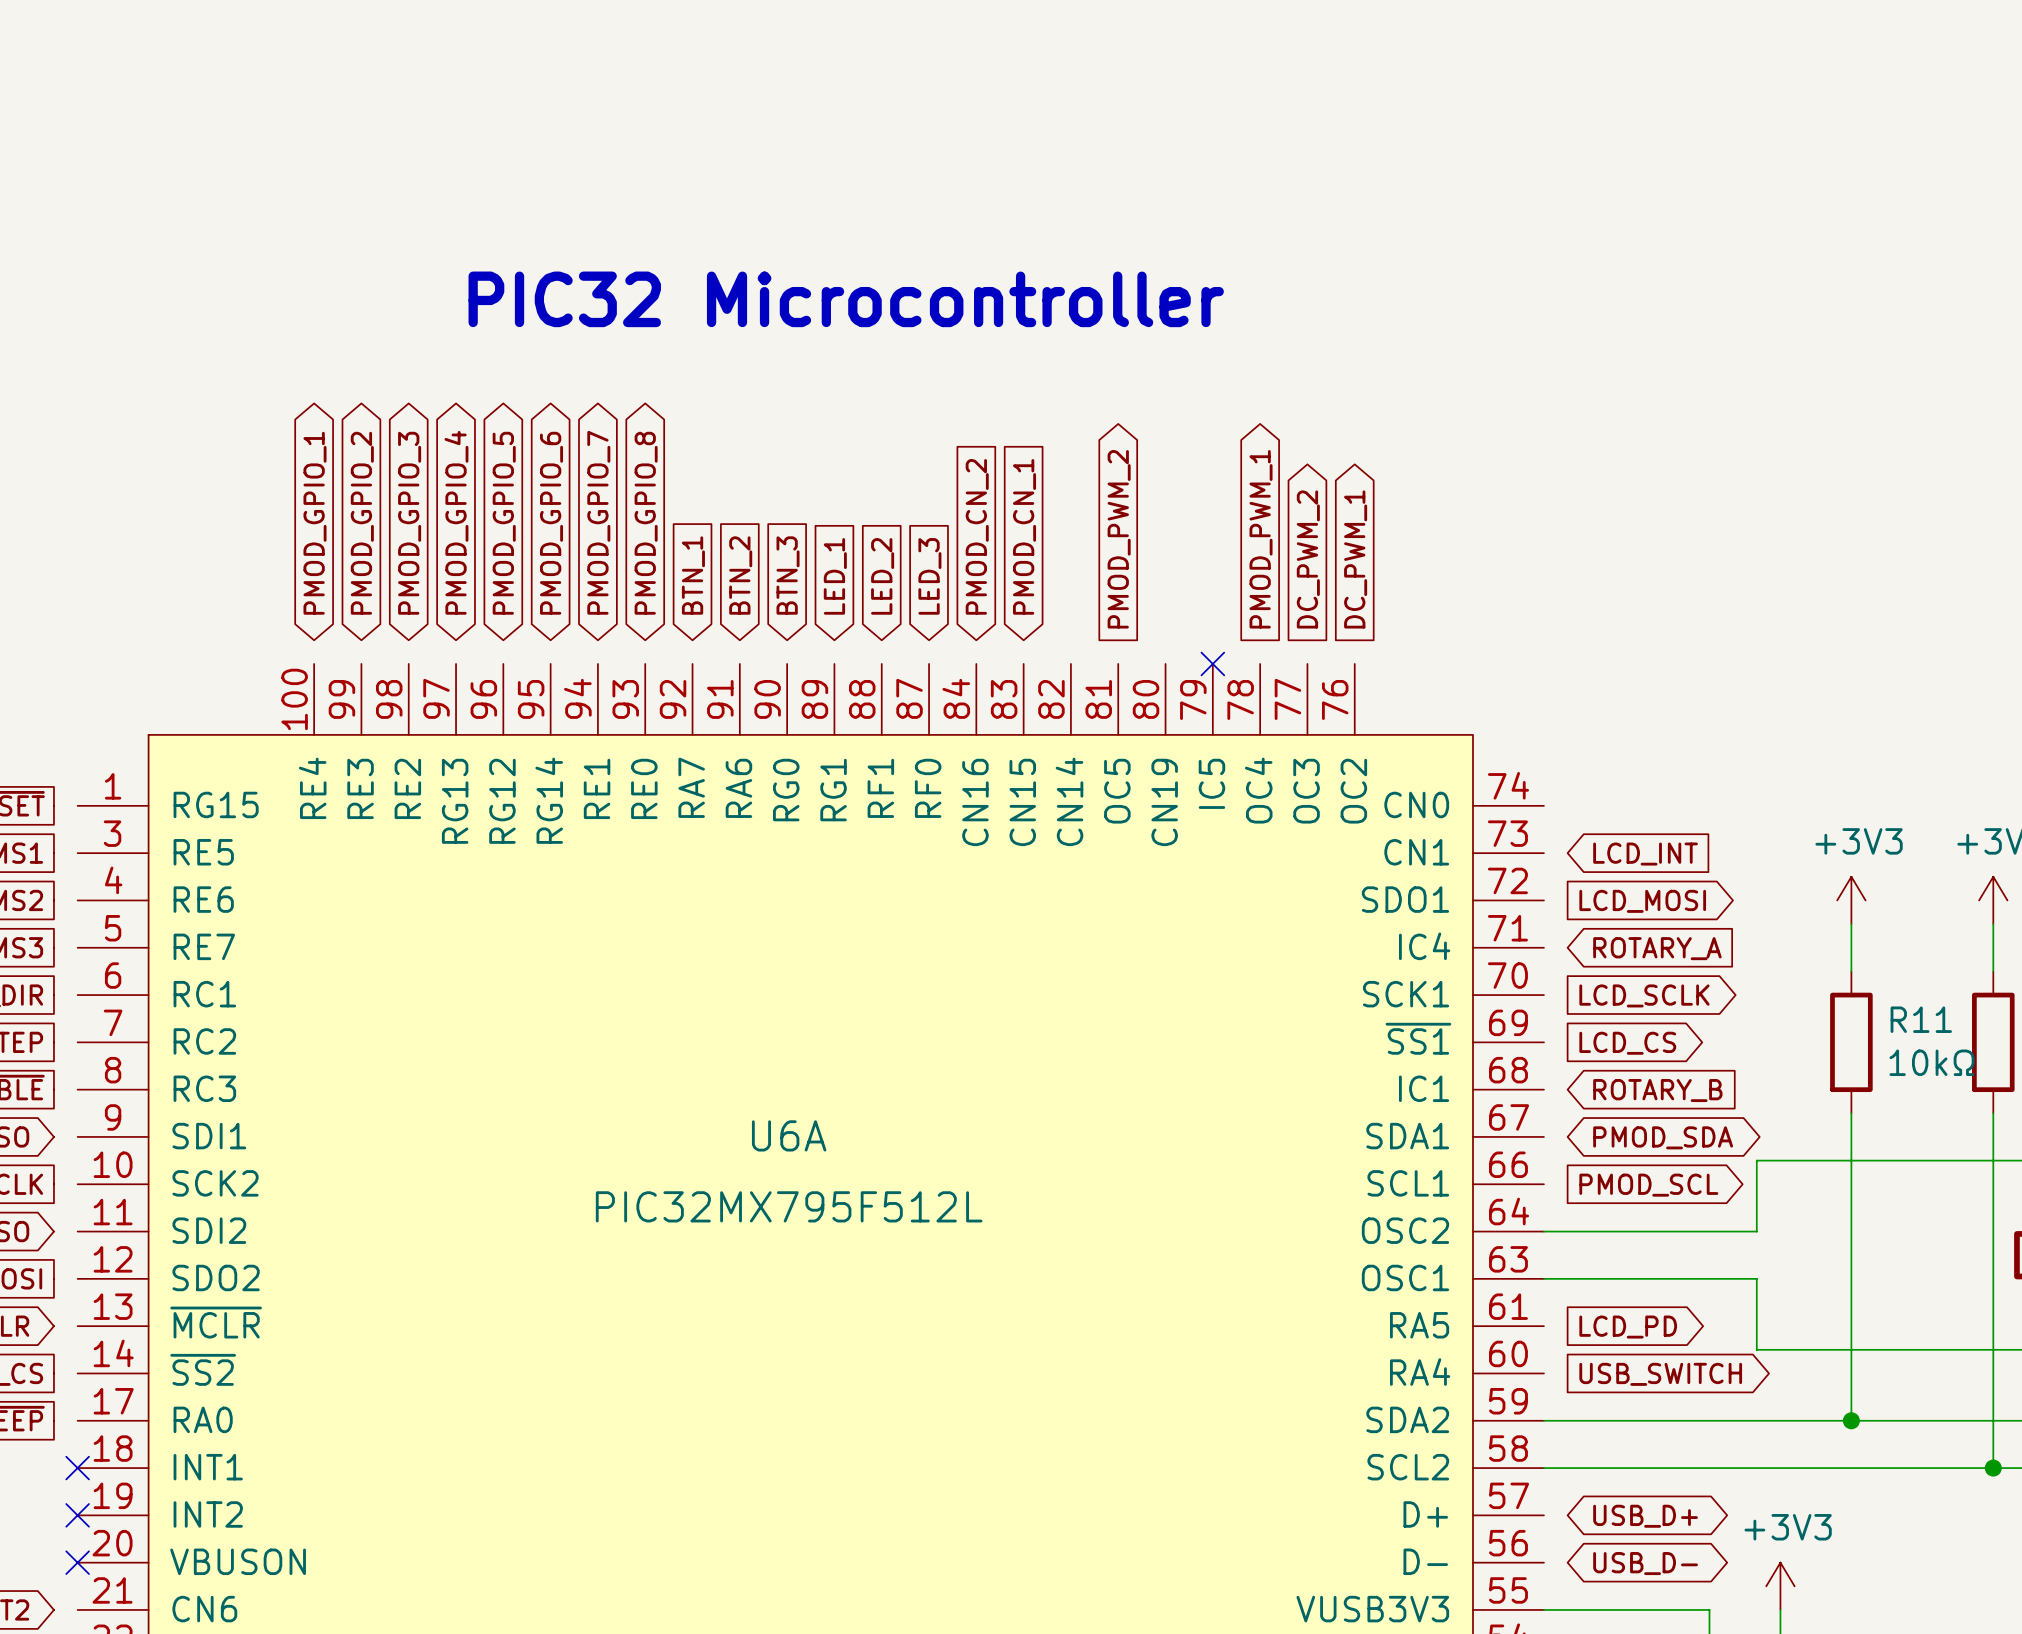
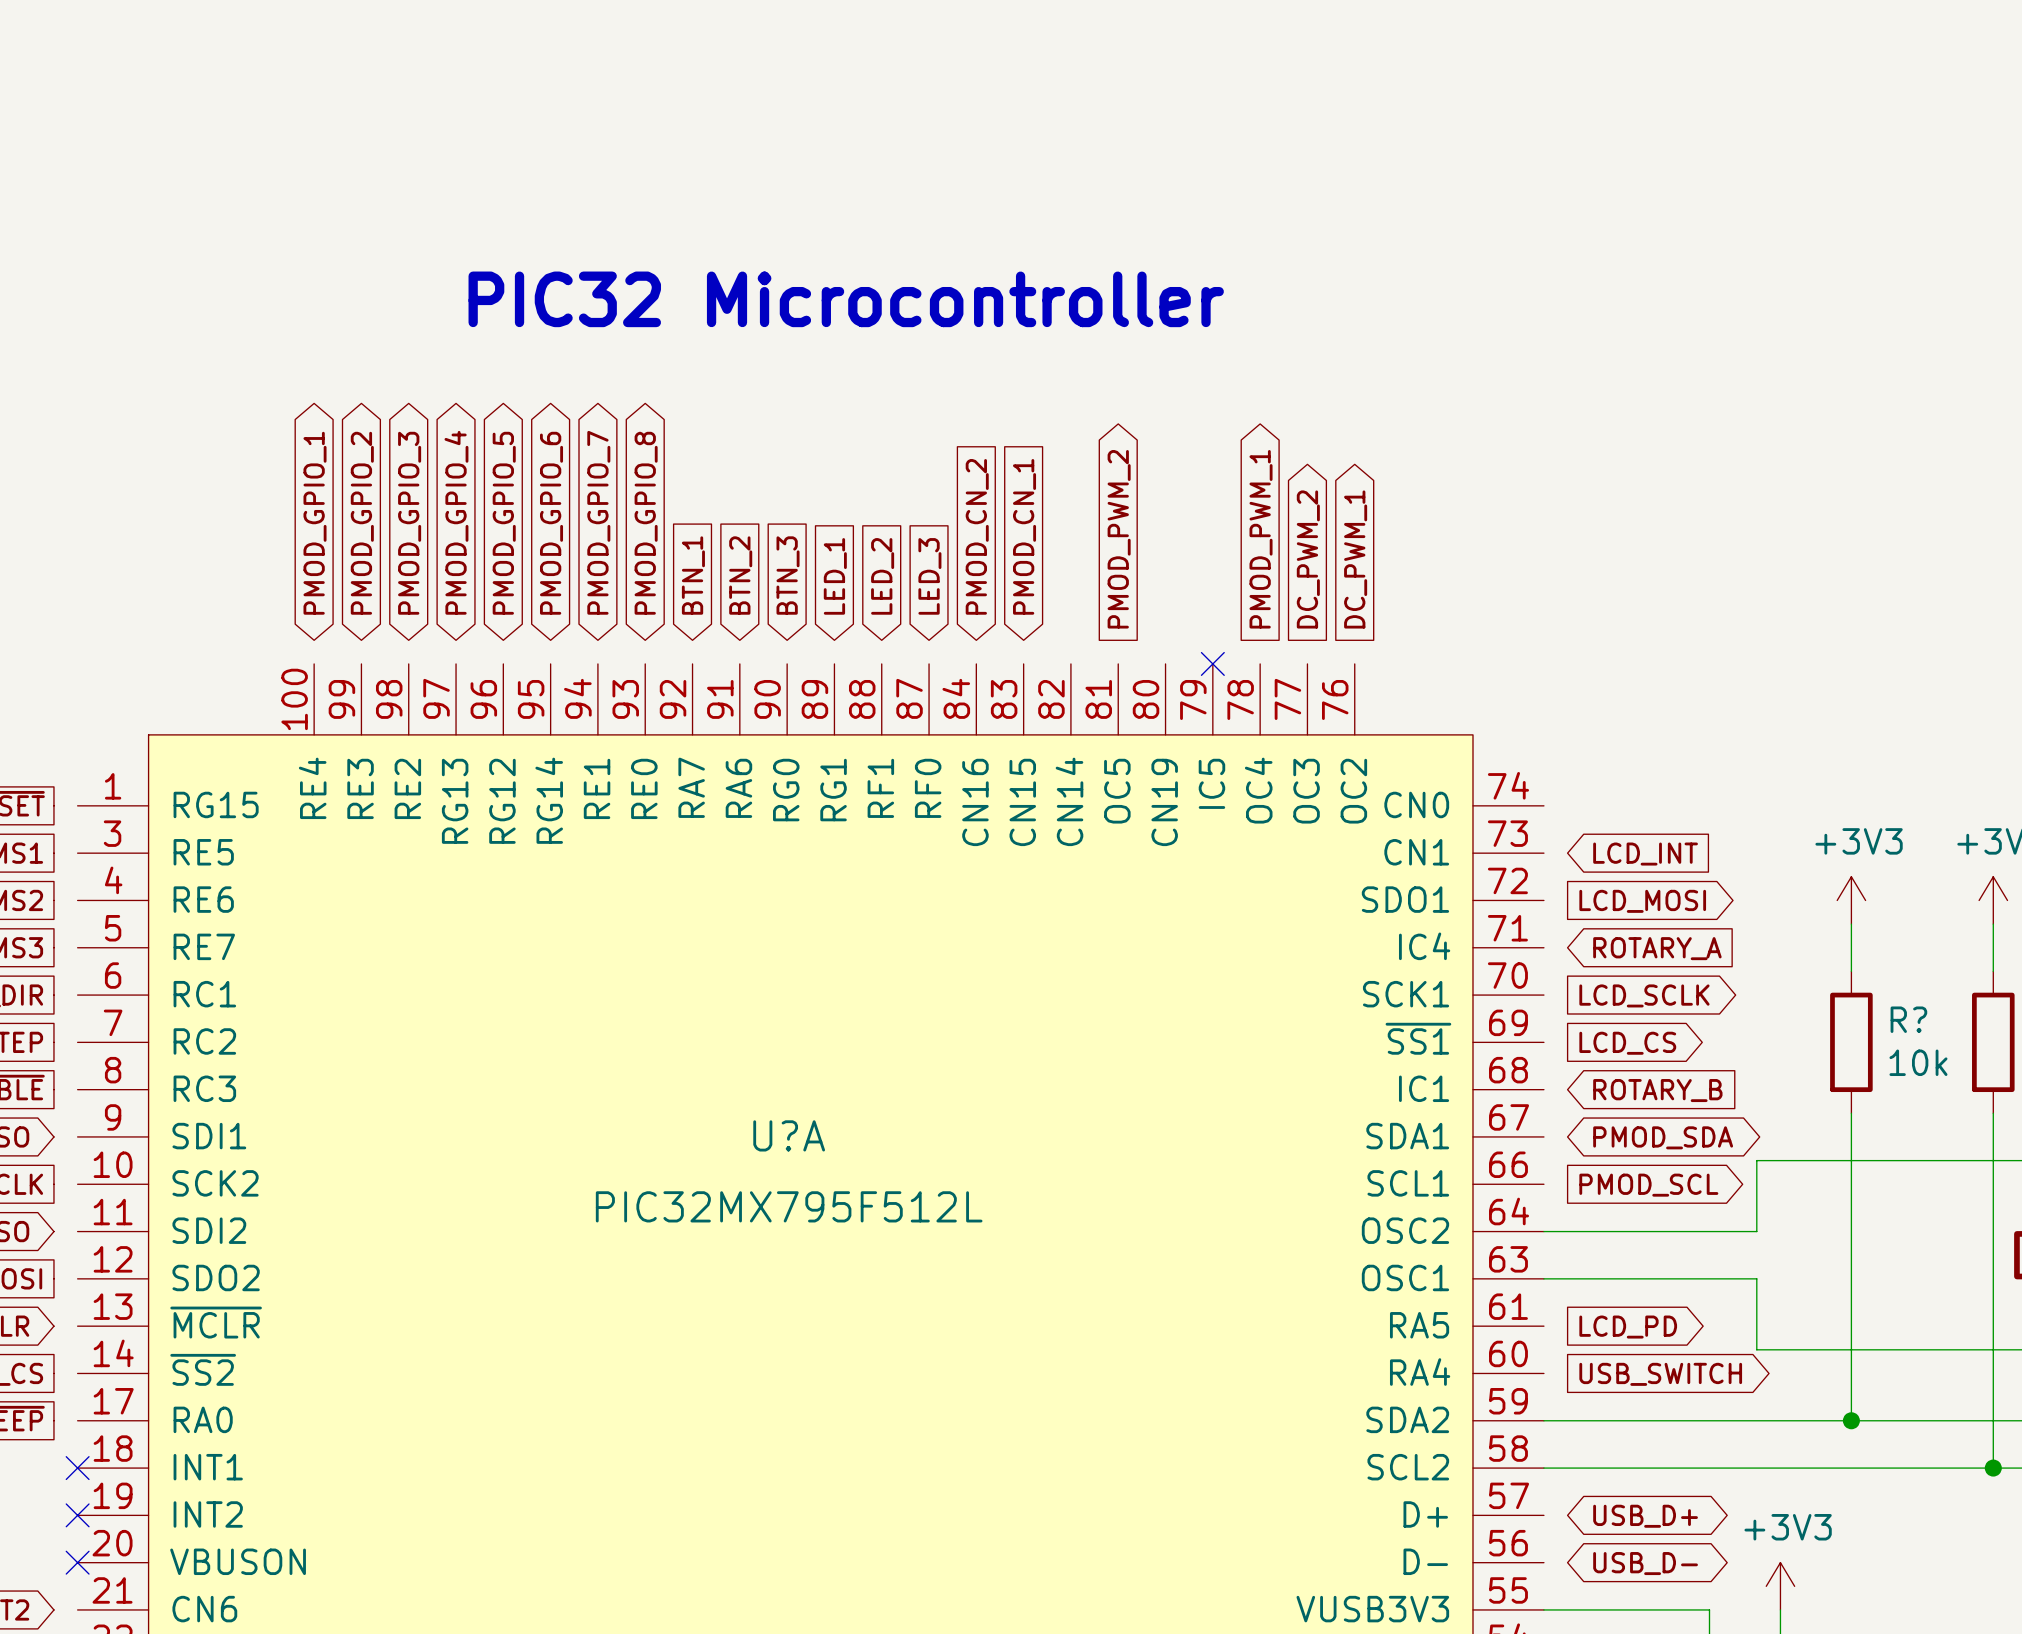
R11 name: R11 (1921, 1019) -> R? (1908, 1019)
R11 value: 10kΩ (1931, 1062) -> 10k (1918, 1062)
U6A name: U6A (789, 1135) -> U?A (789, 1135)

